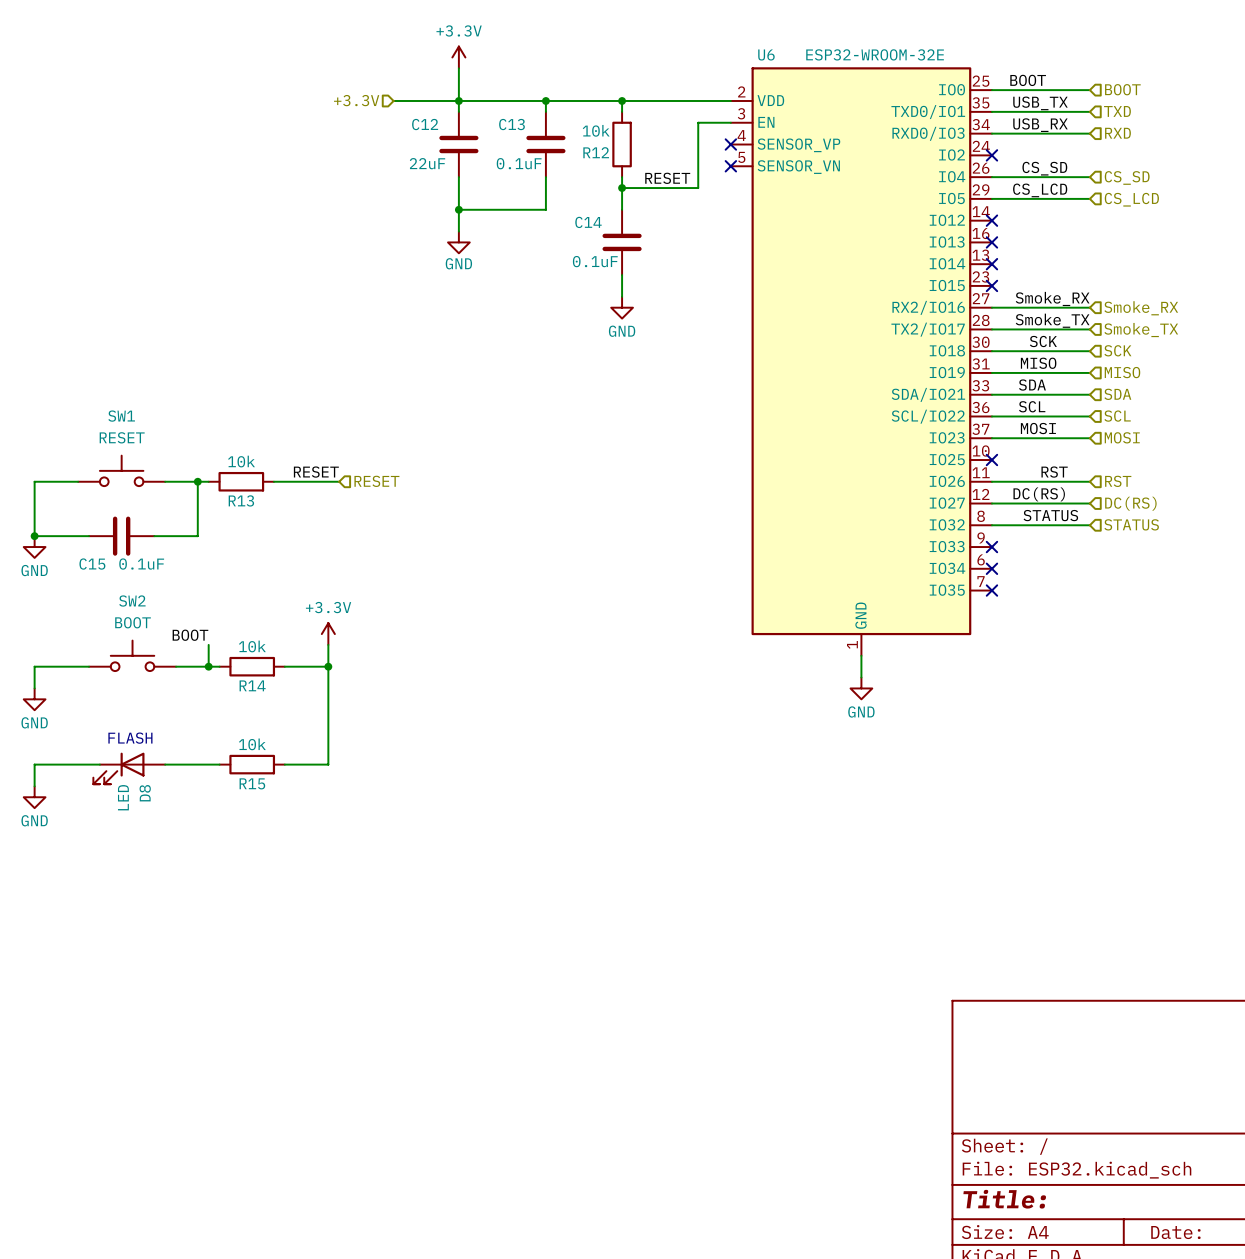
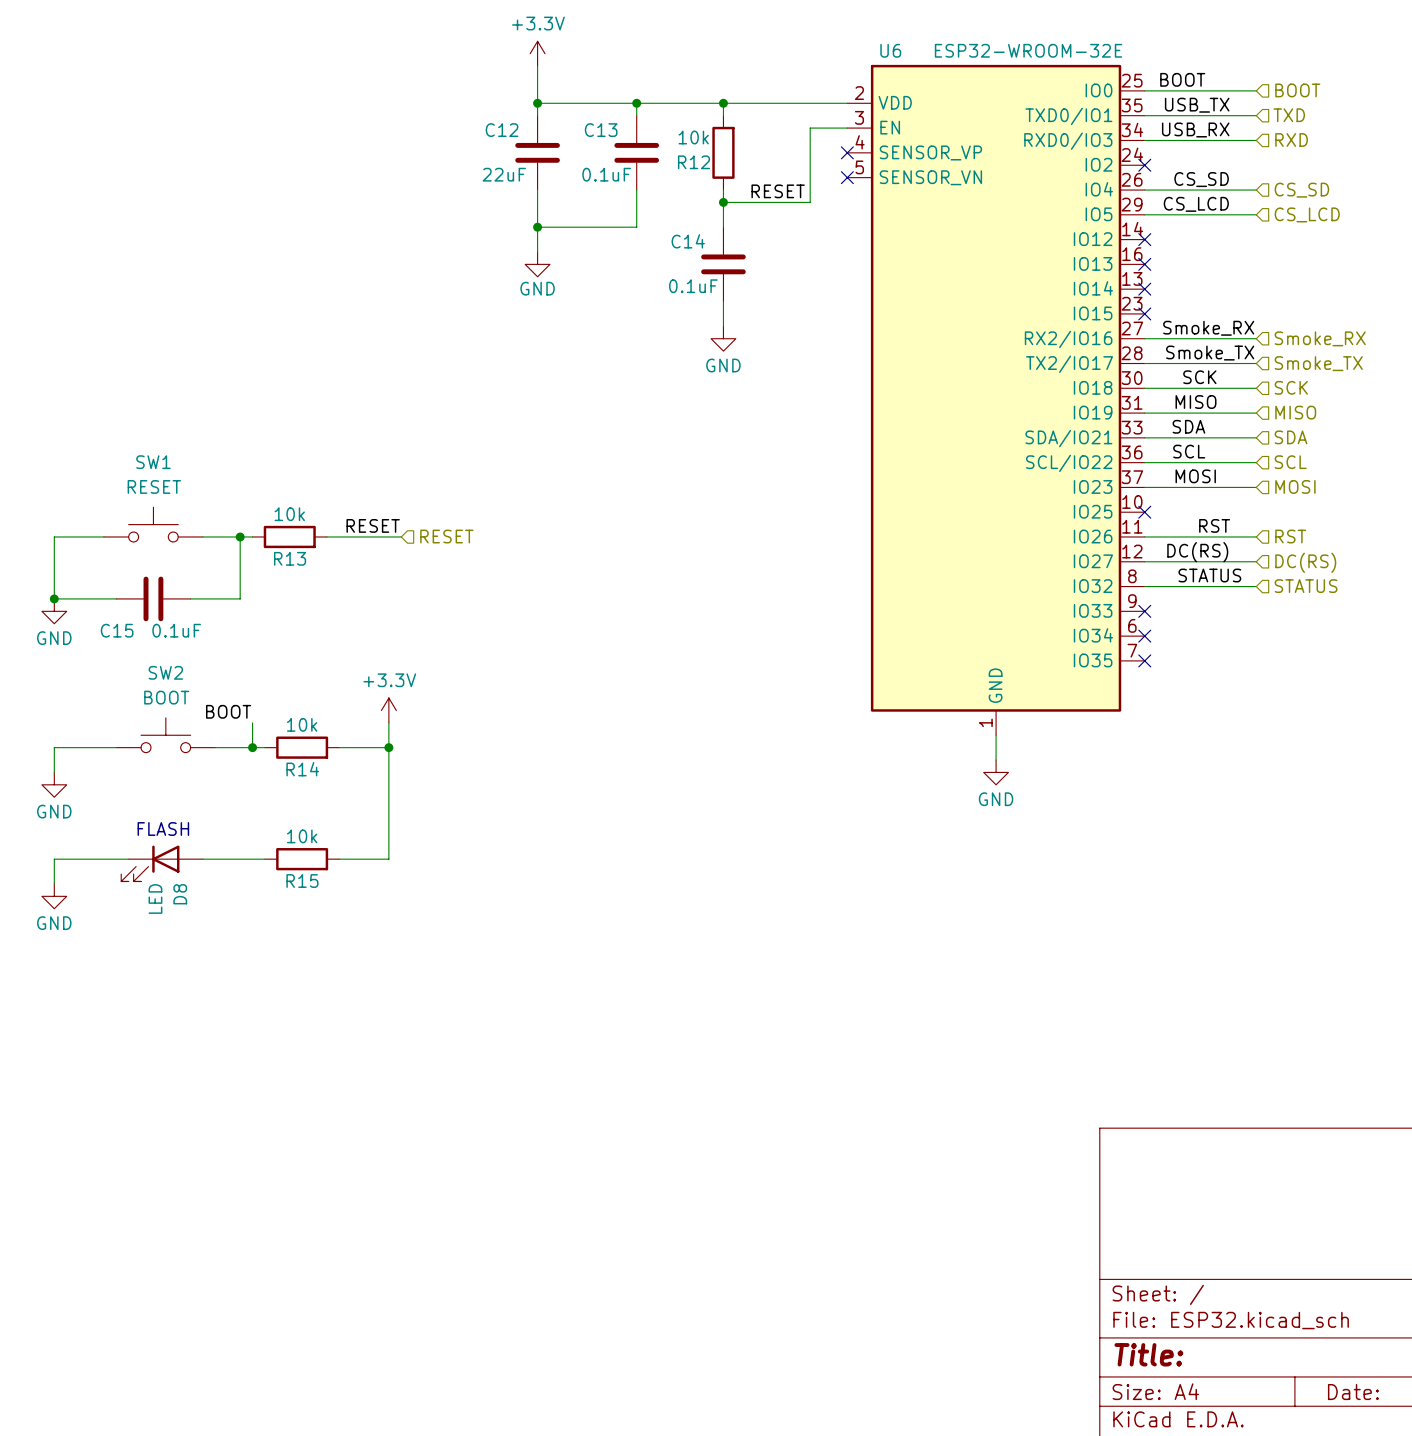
hierarchical label: +3.3V (356, 100) -> none
wire: (393, 100) (458, 100) -> none

